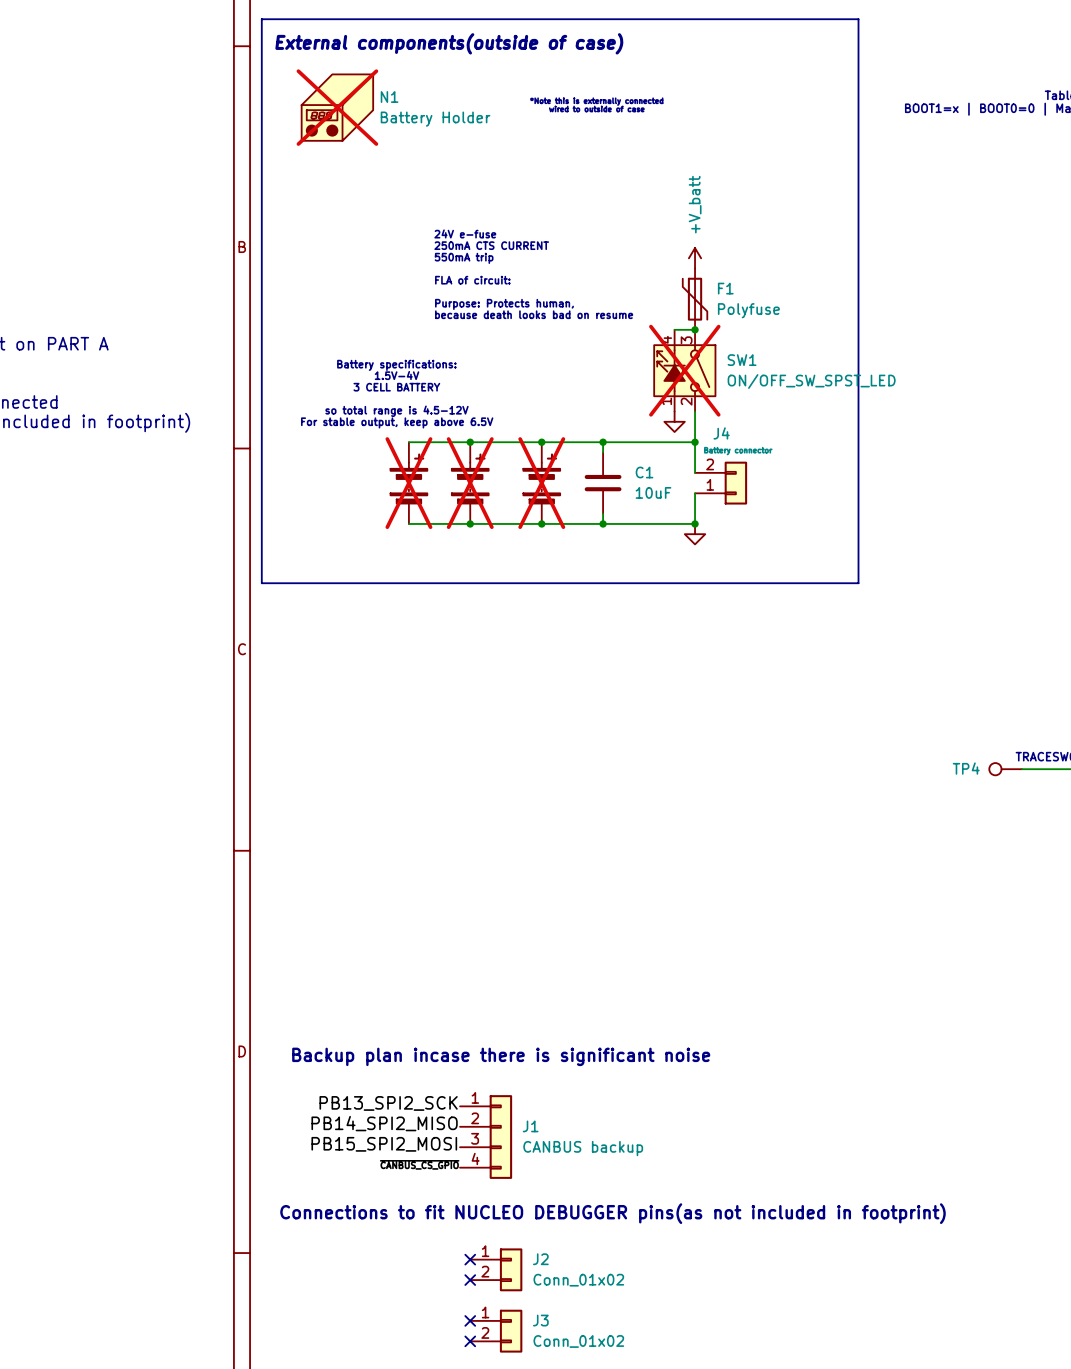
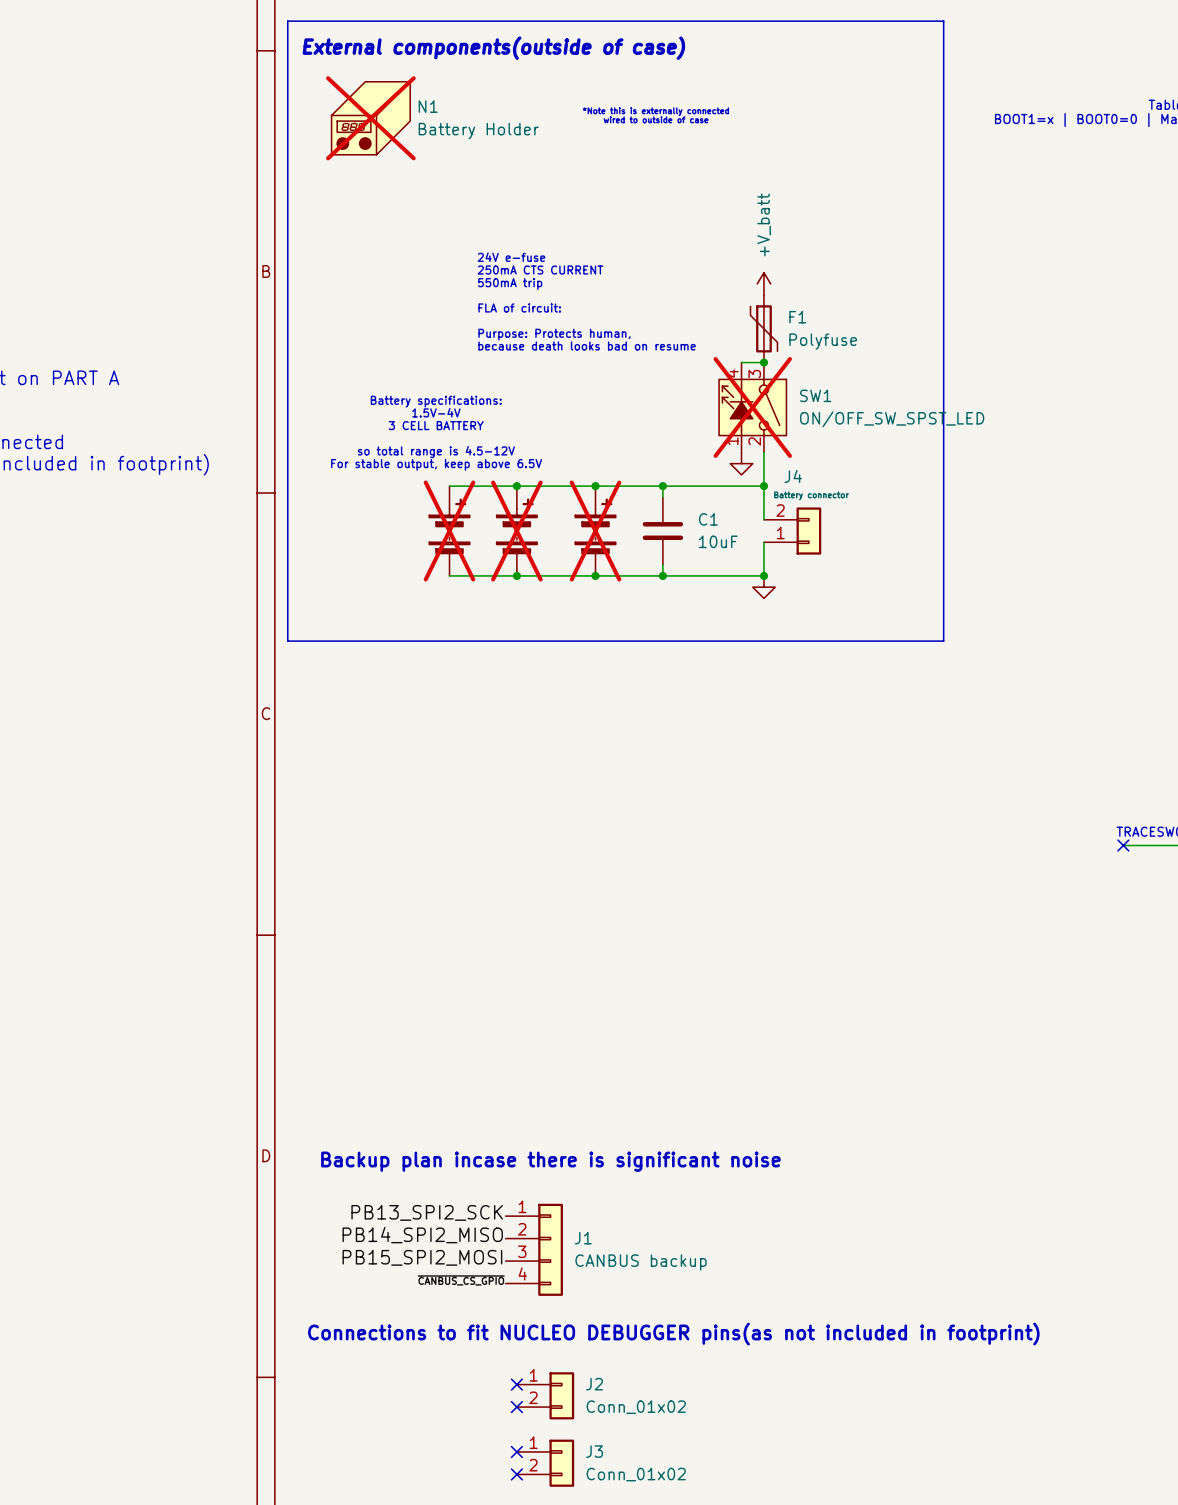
TP4: (1005, 769) -> none
no-connect mark: none -> (1123, 845)

